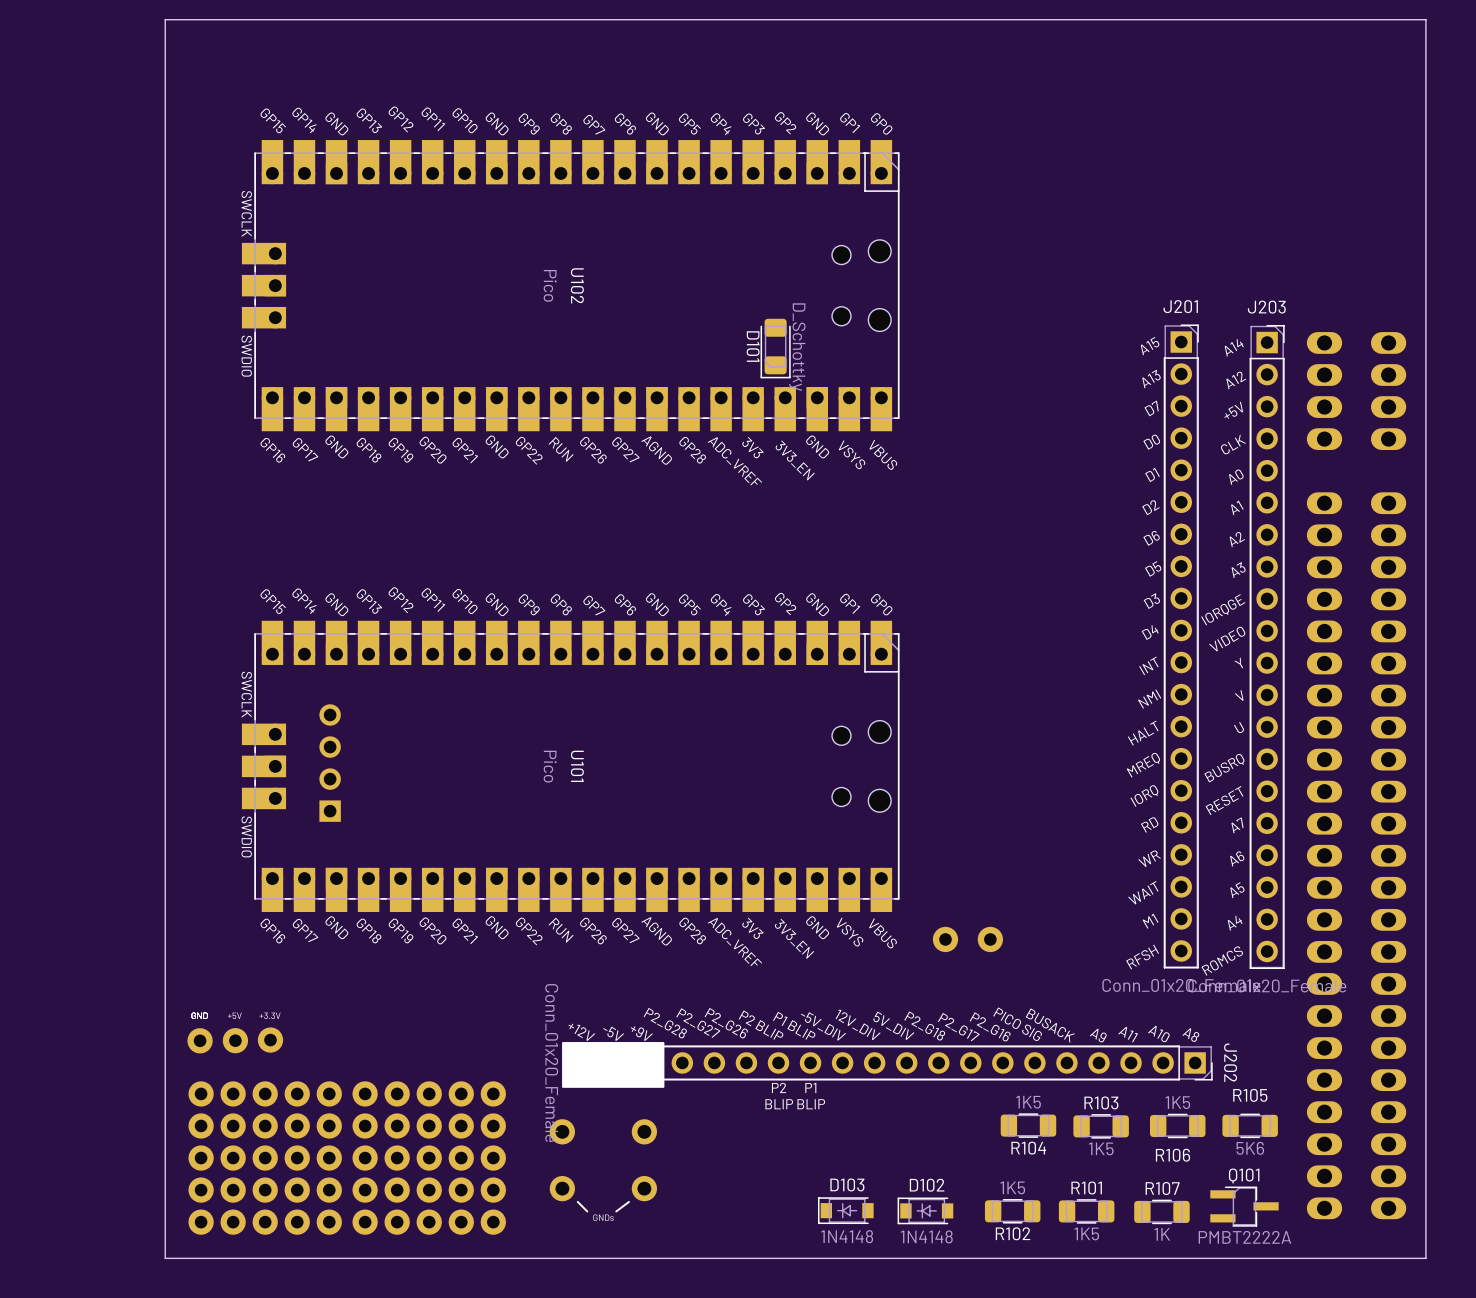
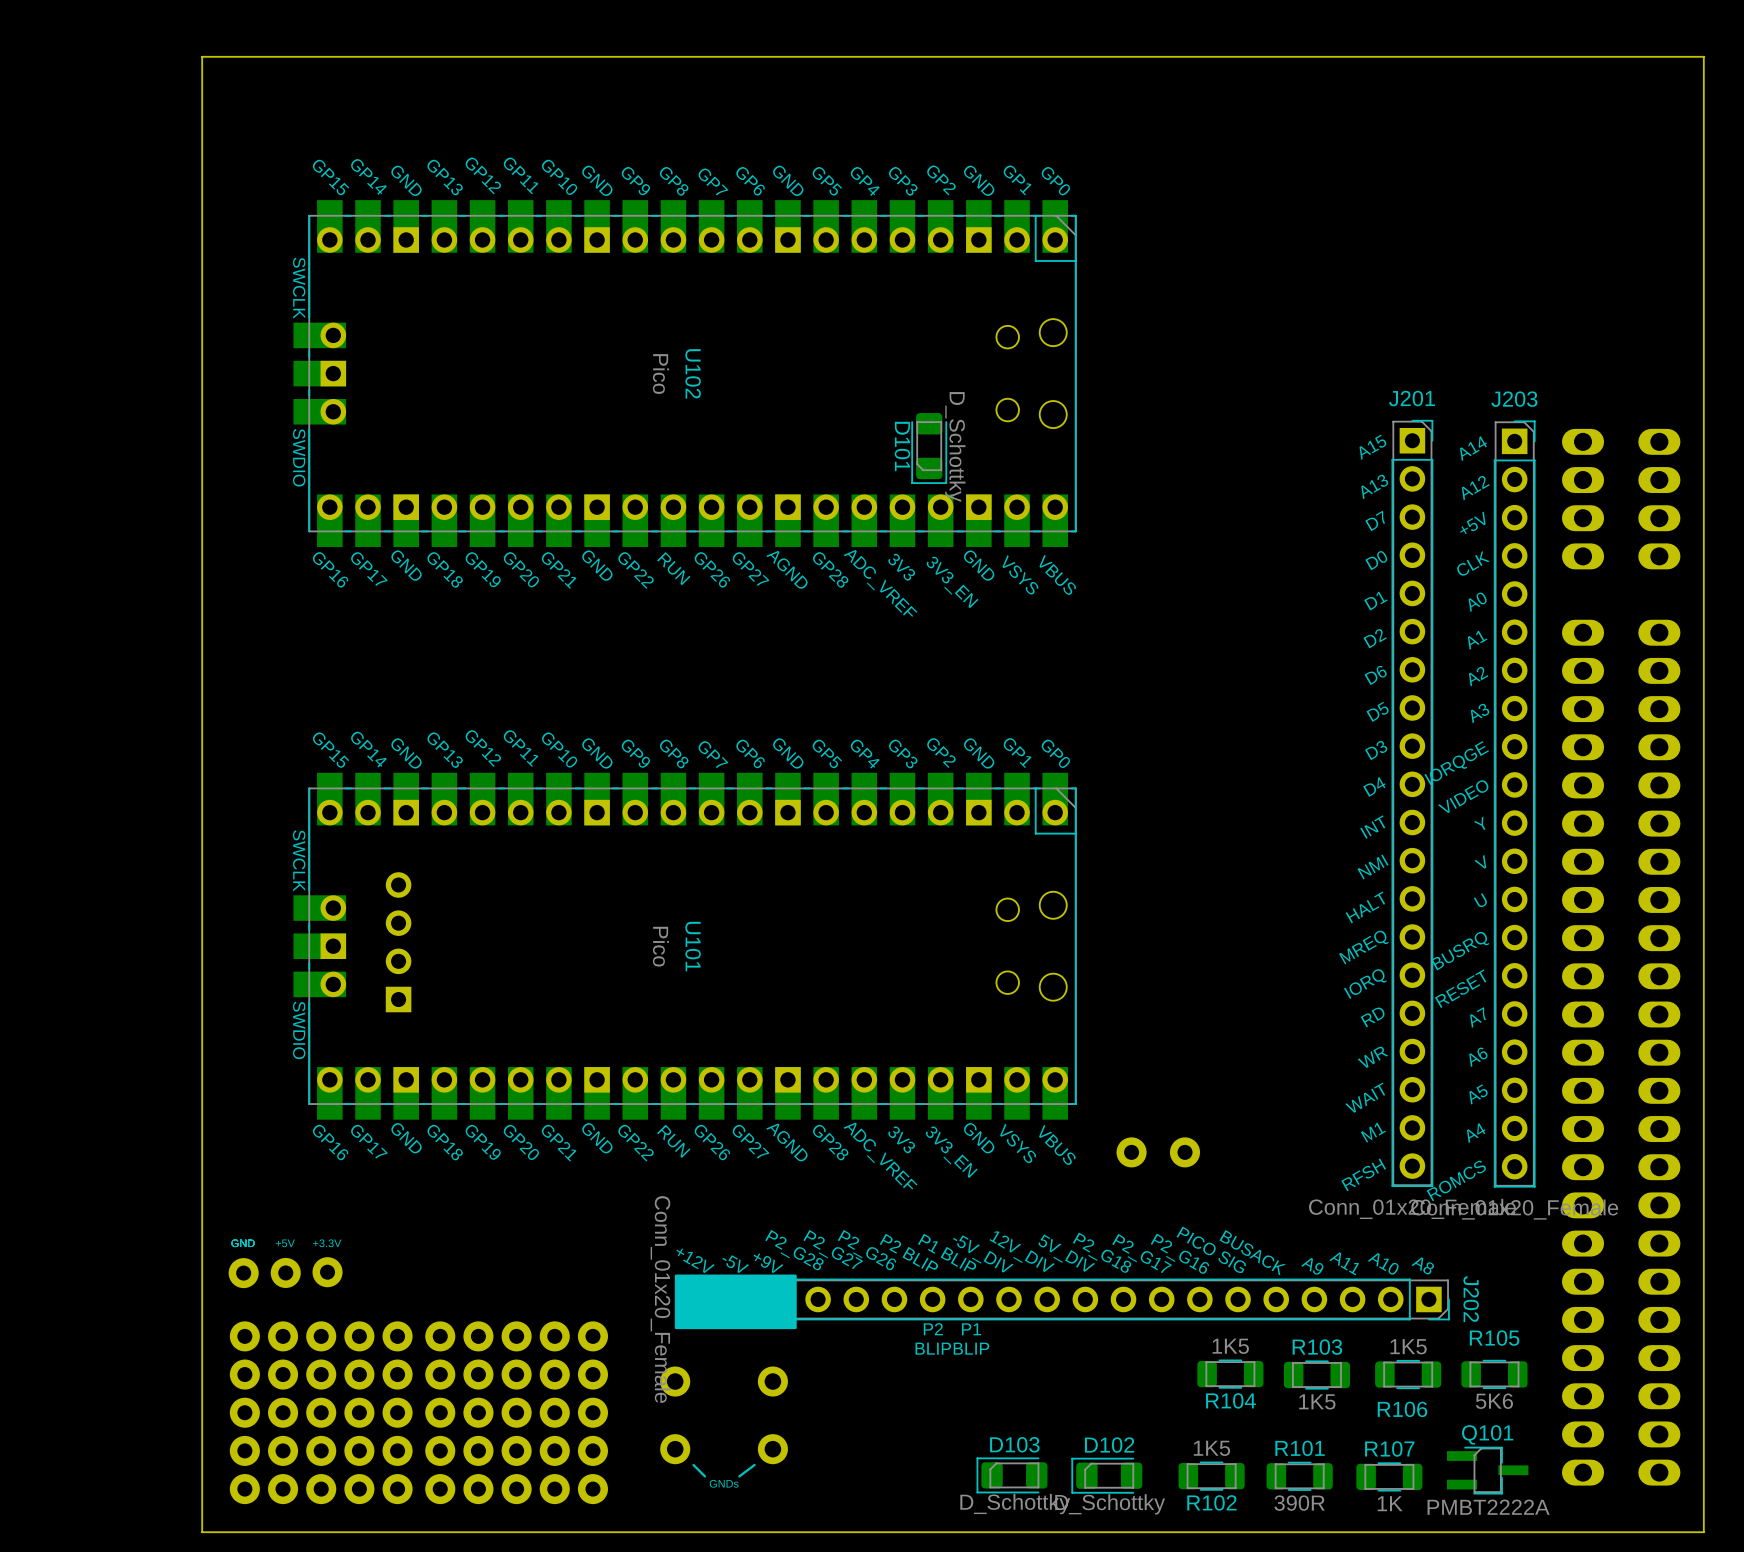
D103 footprint: [817, 1197, 874, 1225] -> [976, 1457, 1048, 1494]
D102 footprint: [897, 1197, 954, 1225] -> [1071, 1457, 1143, 1494]
R101 value: 1K5 (1086, 1233) -> 390R (1299, 1503)
D103 value: 1N4148 (847, 1236) -> D_Schottky (1015, 1504)
D102 value: 1N4148 (926, 1236) -> D_Schottky (1110, 1504)

